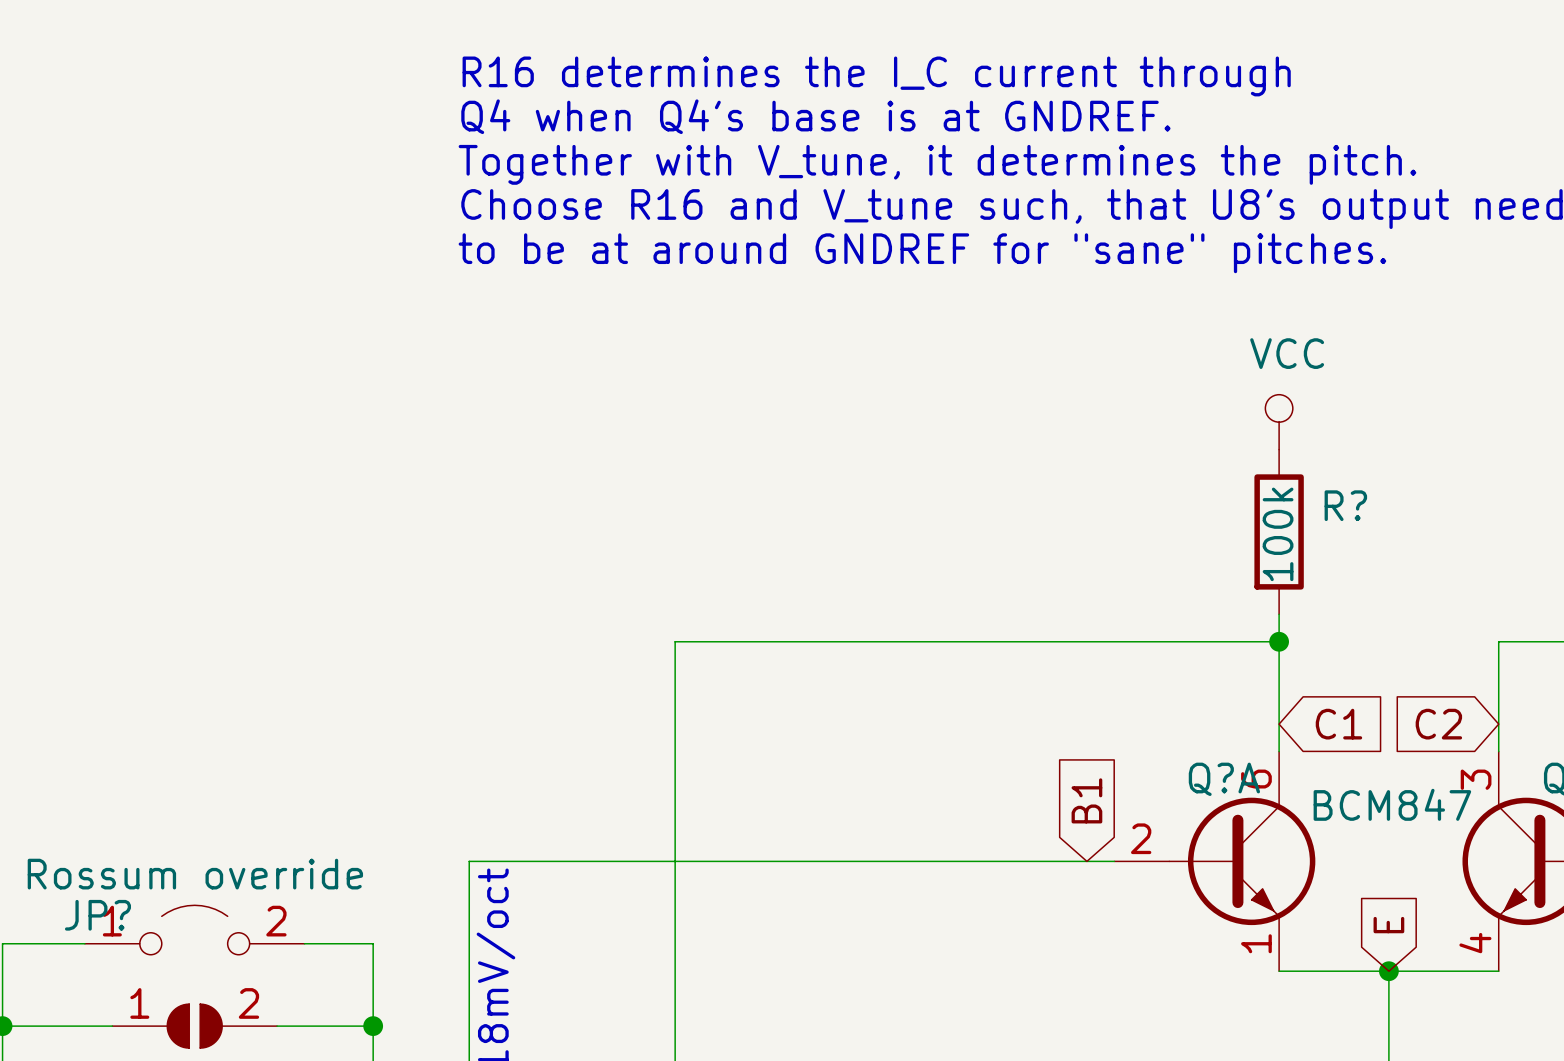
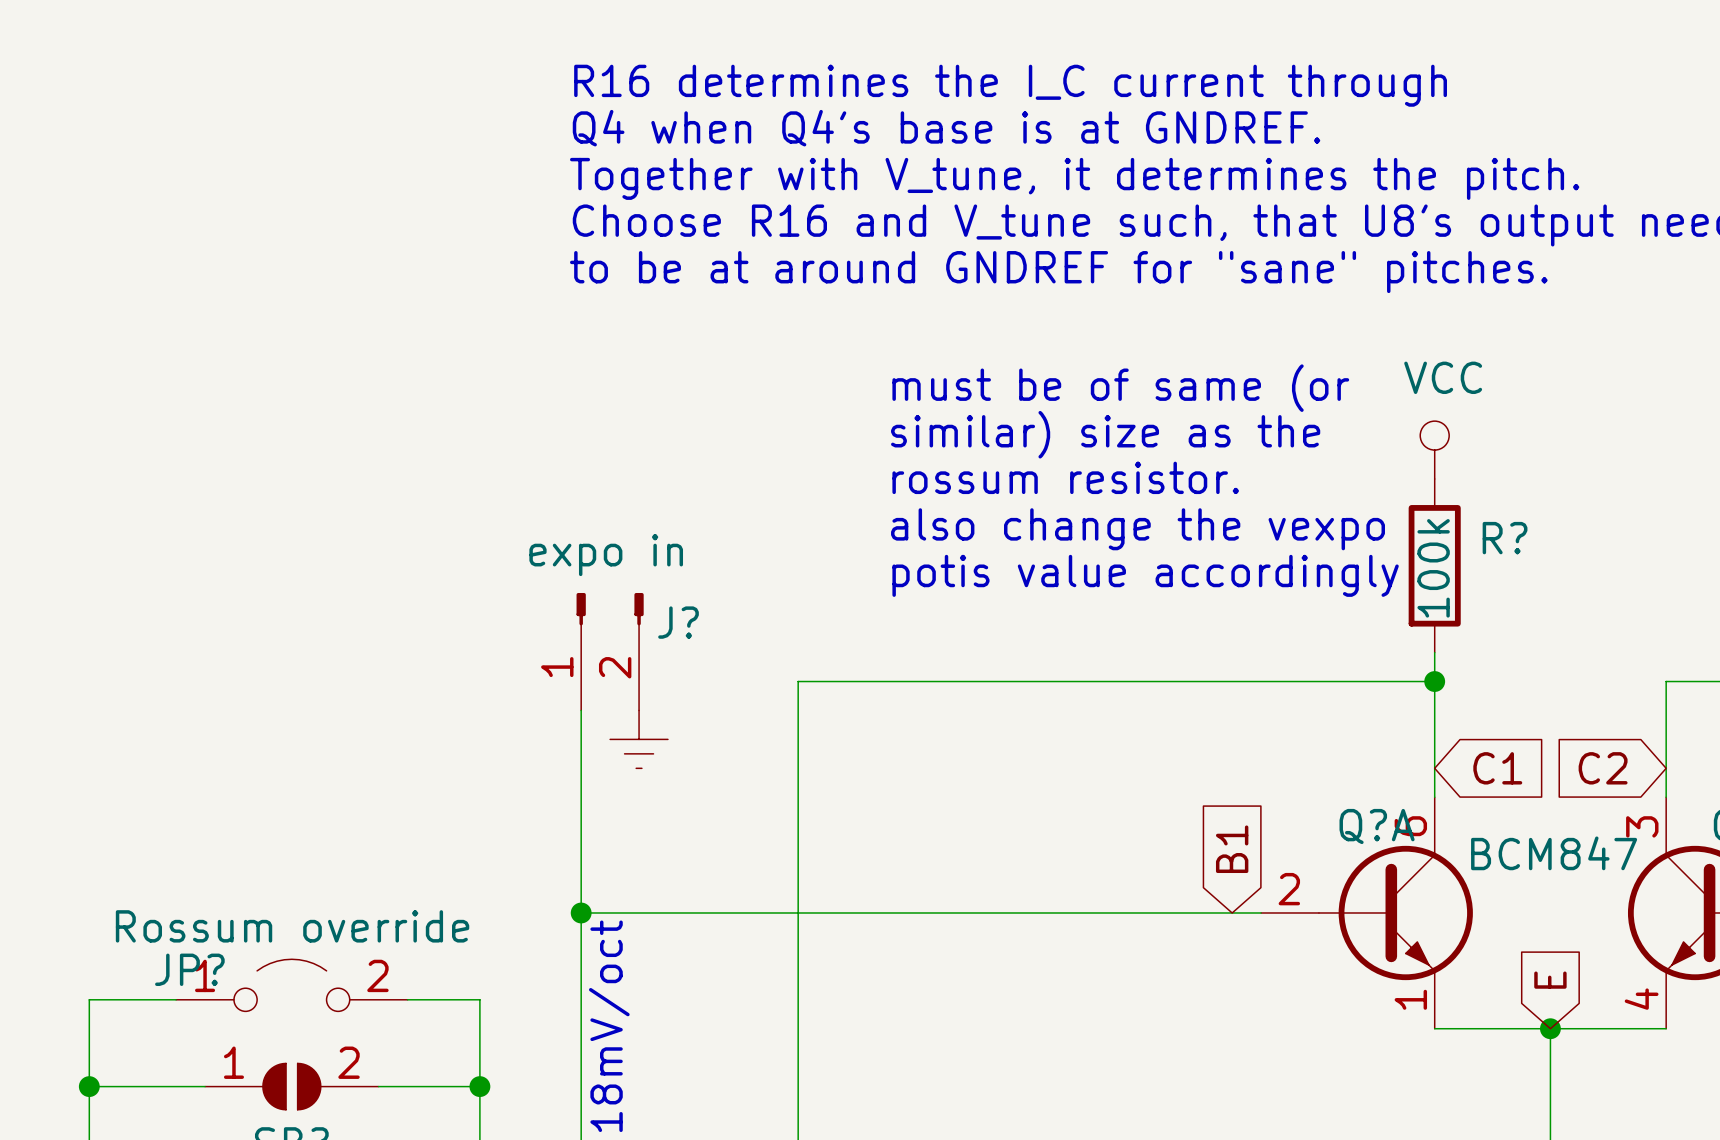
text: none -> must be of same (or (1120, 388)
text: none -> similar) size as the (1105, 434)
text: none -> rossum resistor. (1065, 477)
text: none -> also change the vexpo (1138, 529)
text: none -> potis value accordingly (1145, 575)
J?: none -> expo in (610, 651)
wire: none -> (581, 710) (581, 912)
power symbol: none -> (639, 739)
junction: none -> (581, 912)

